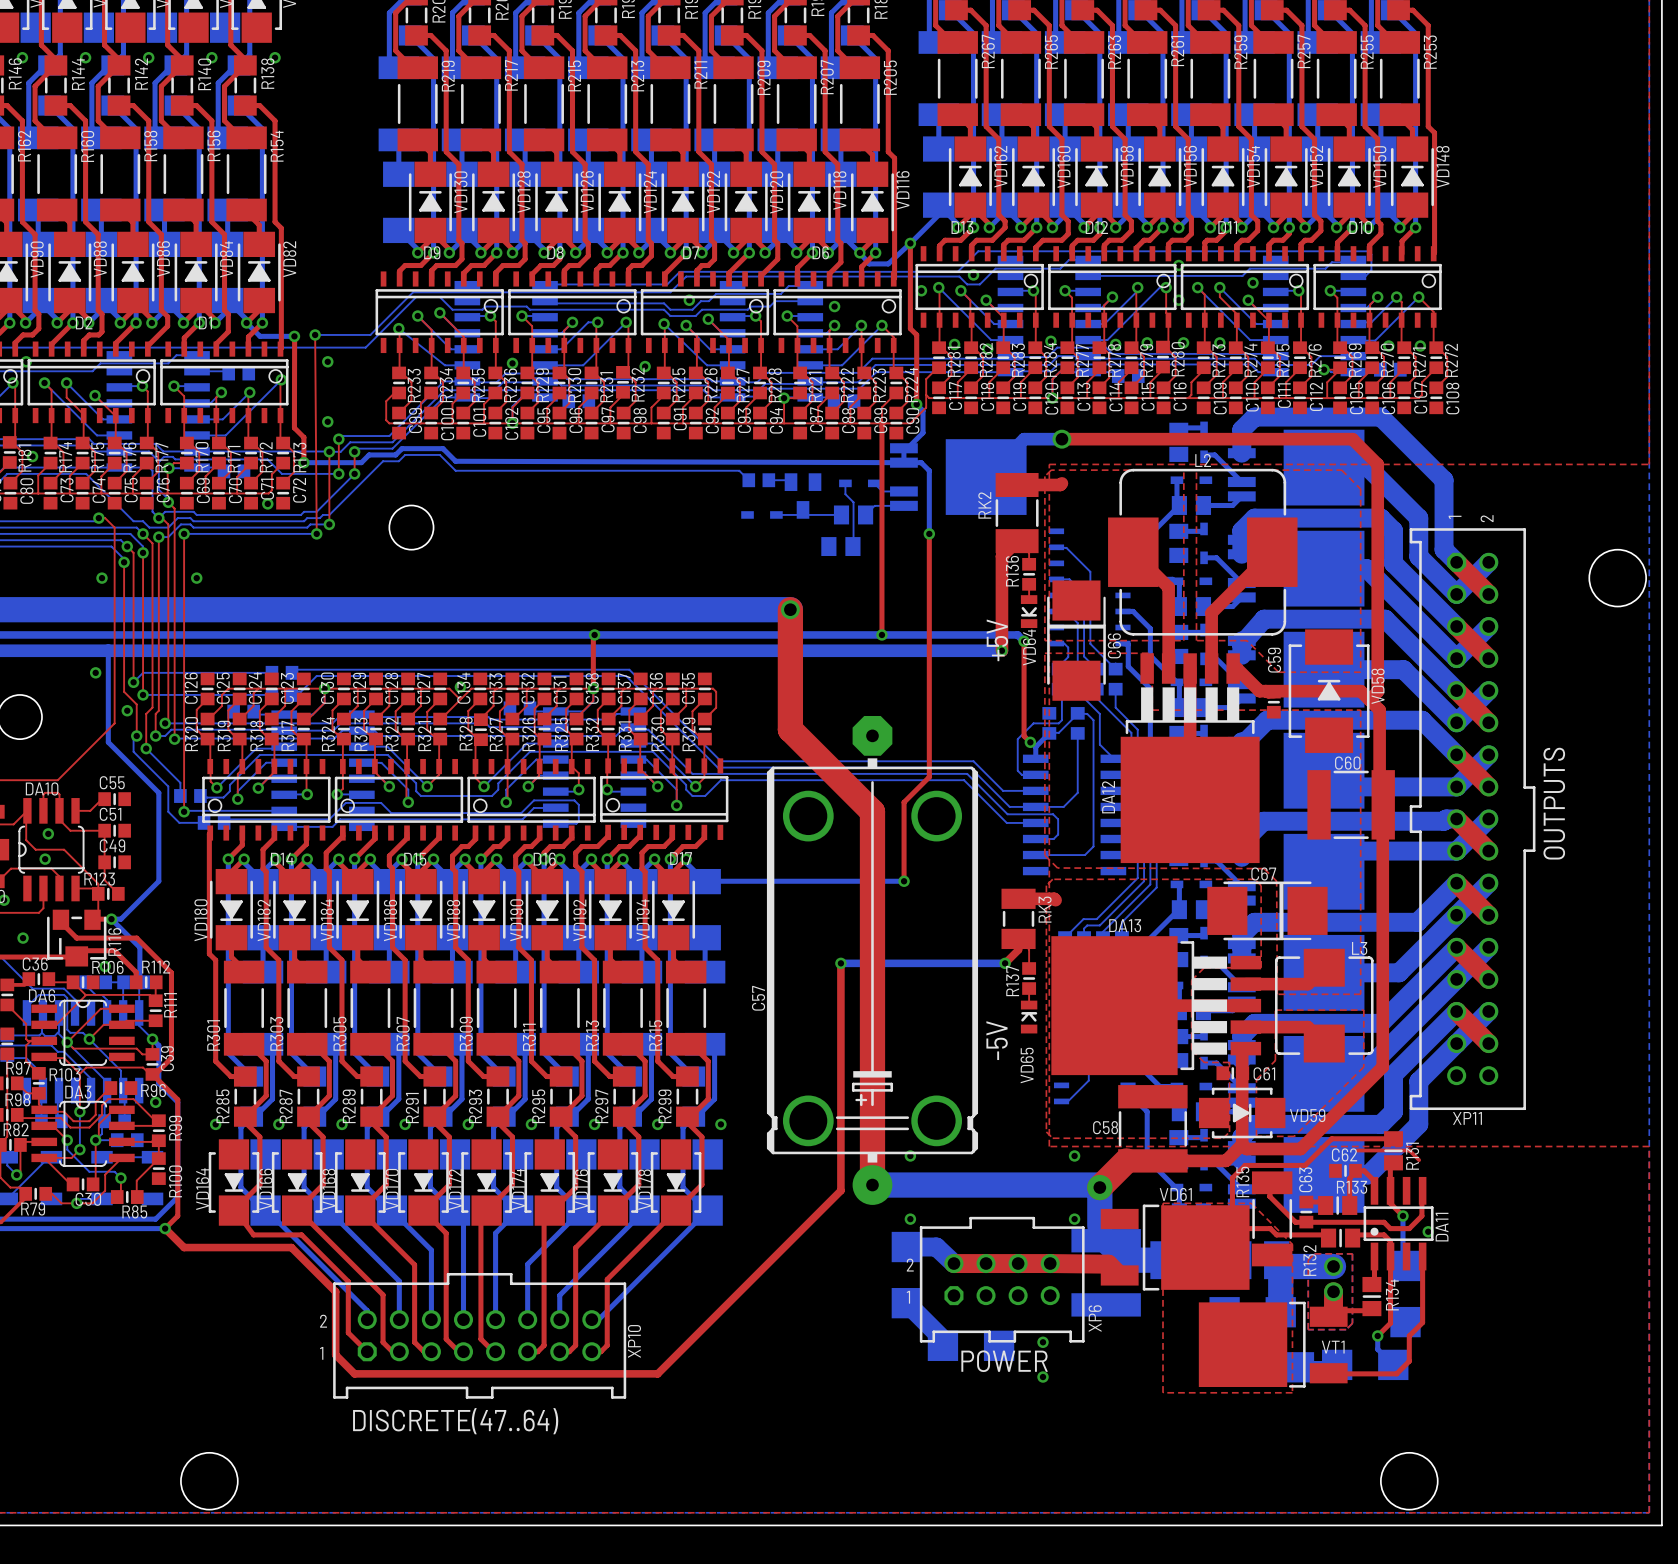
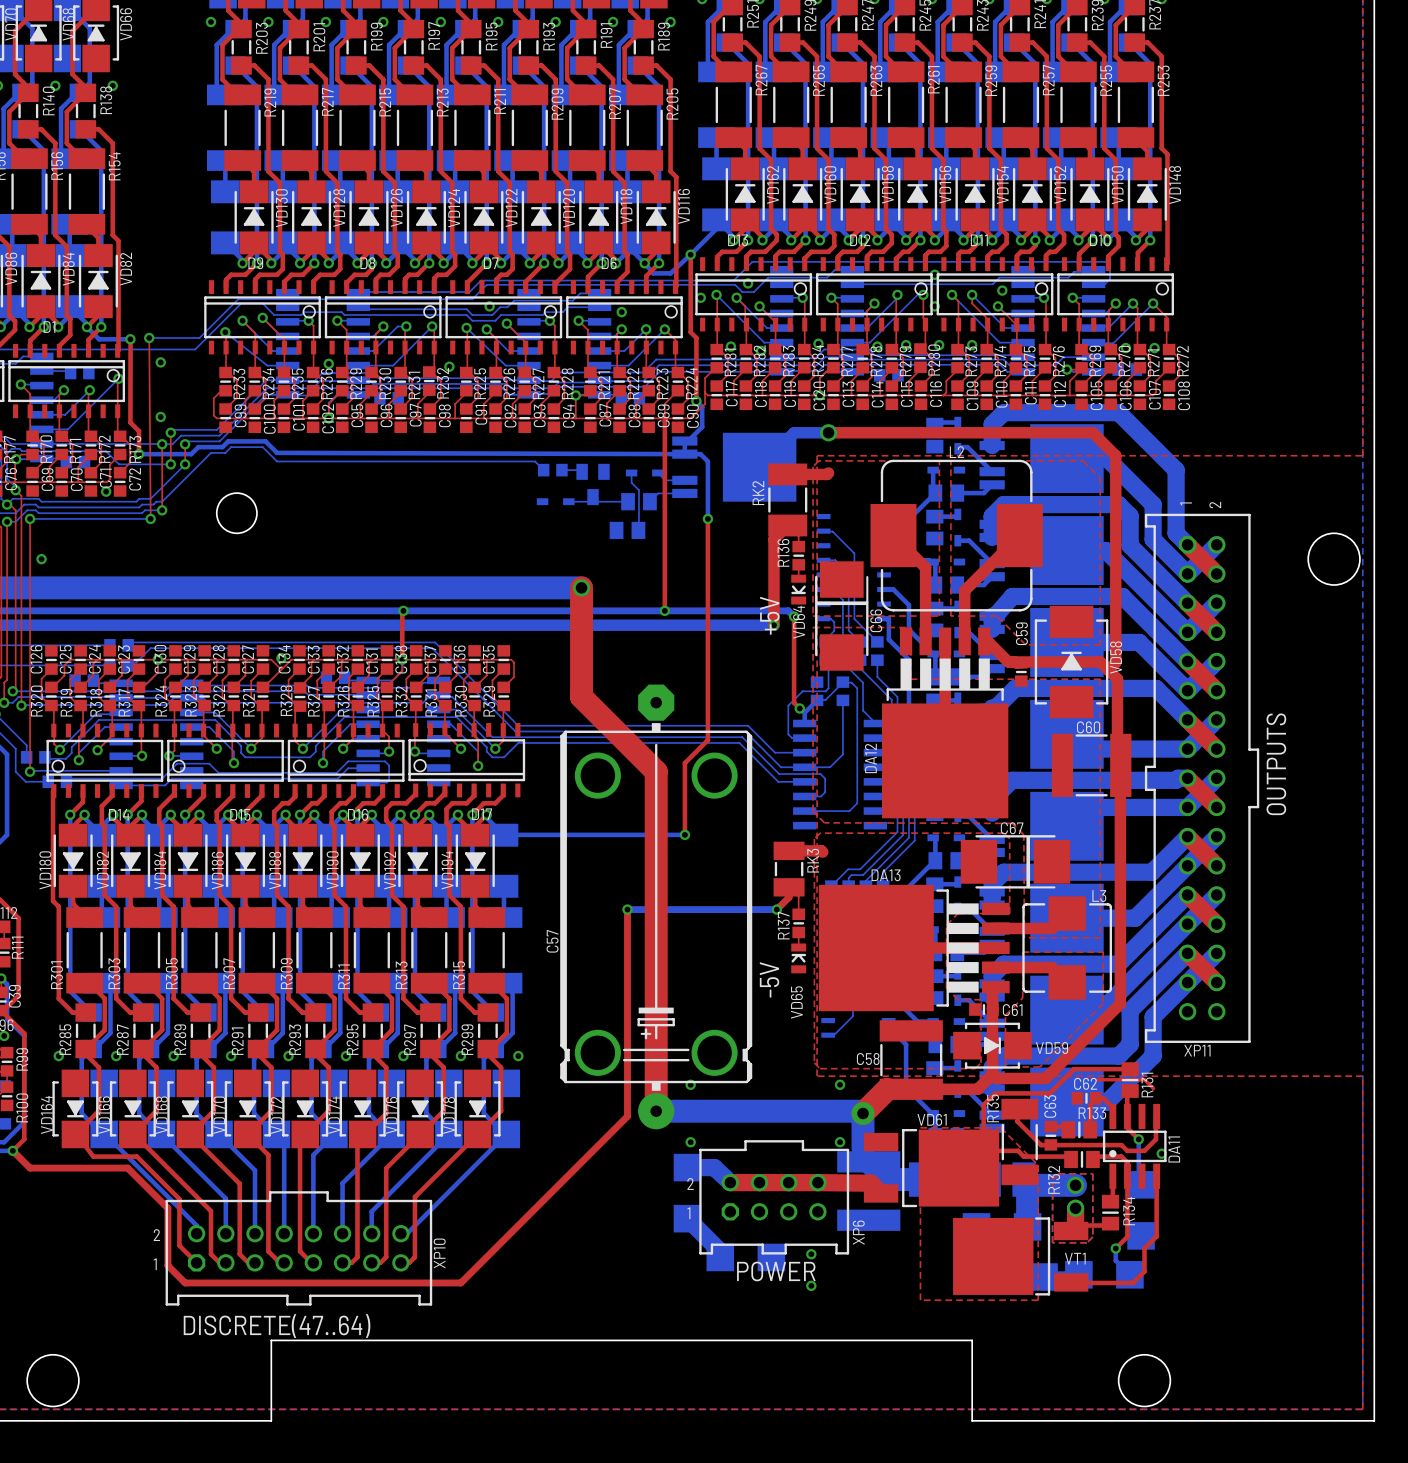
board edge: (449, 1525) (1219, 1525) -> (271, 1420) (271, 1340) (972, 1340) (972, 1420)

